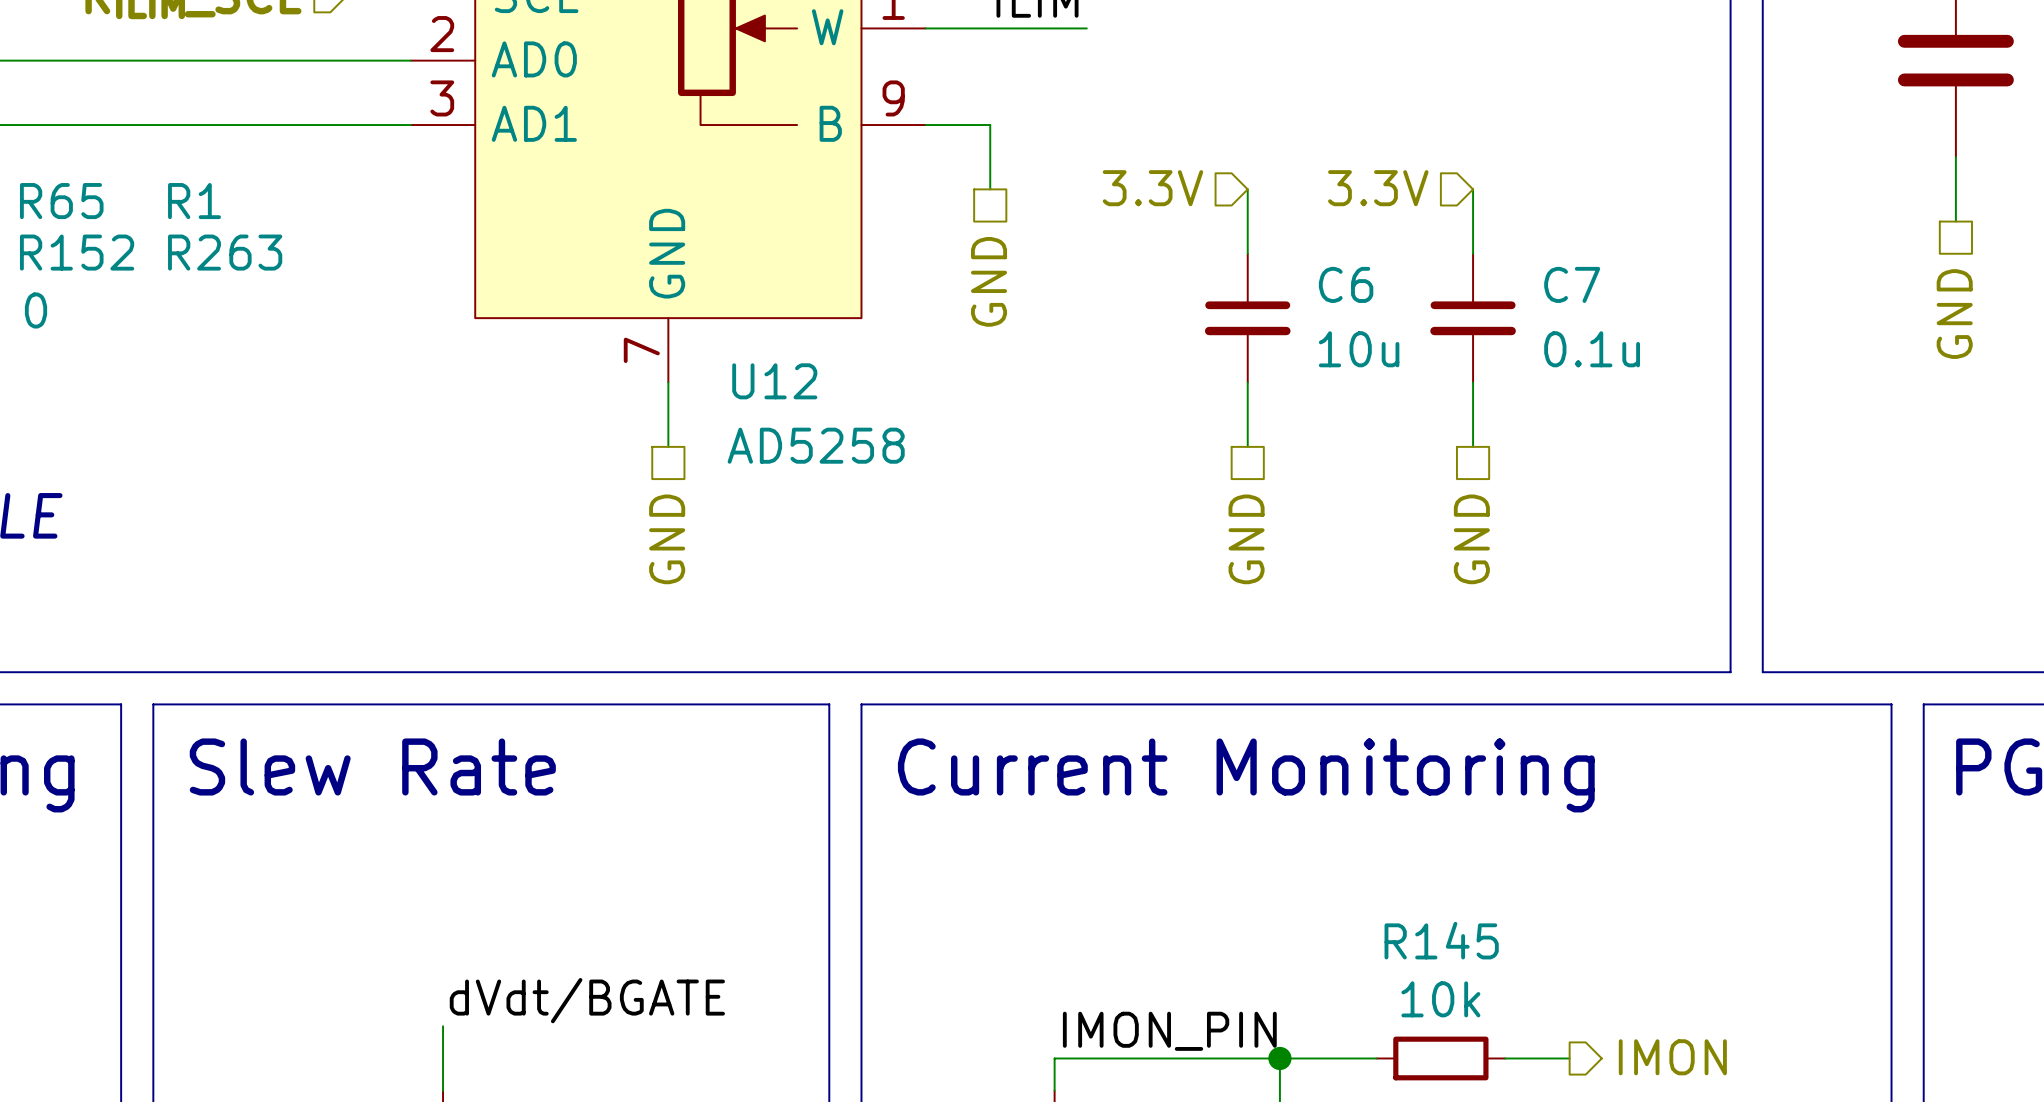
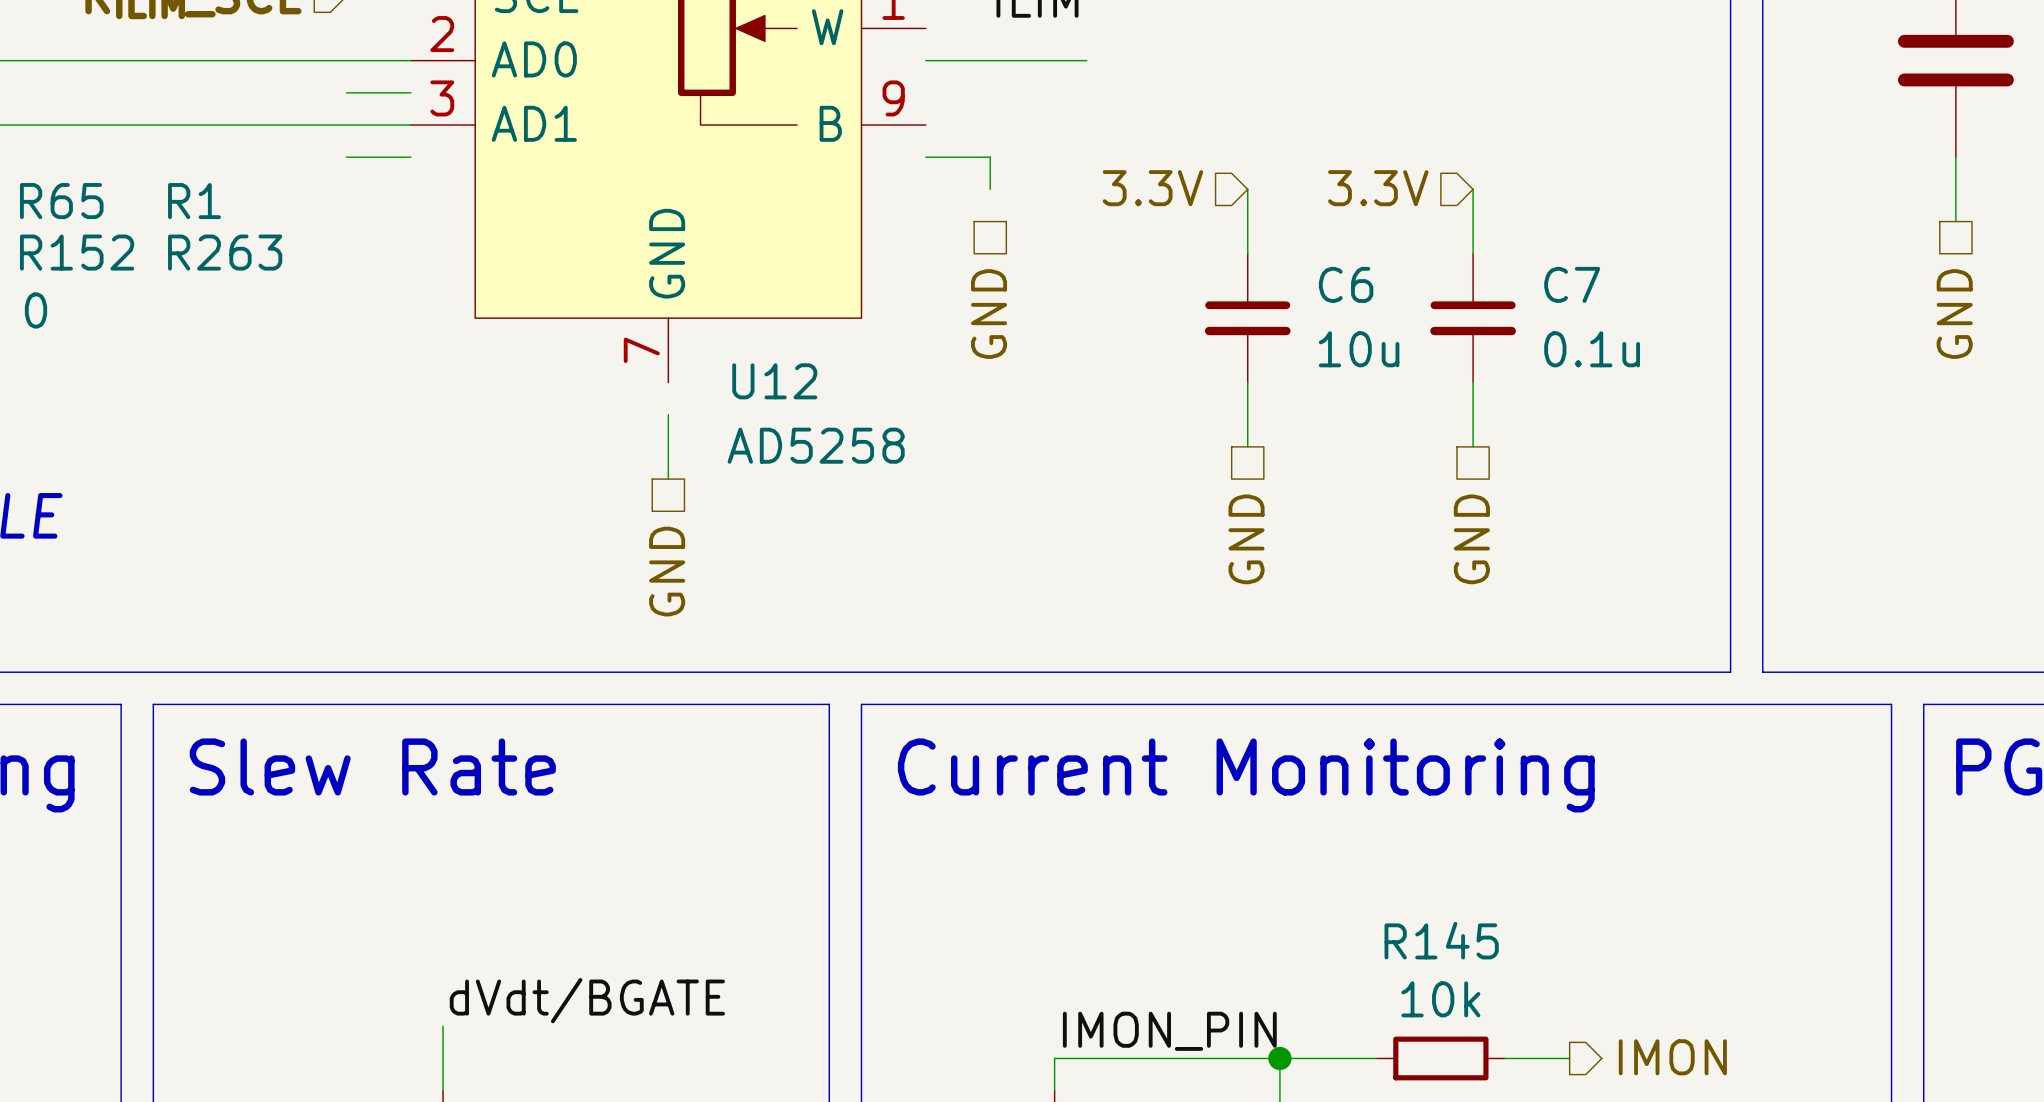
wire: (925, 28) (1086, 28) -> (925, 60) (1086, 60)
wire: none -> (346, 92) (410, 92)
wire: (925, 125) (990, 125) (990, 157) -> (925, 157) (990, 157)
wire: none -> (346, 157) (410, 157)
hierarchical label position: GND (989, 281) -> GND (989, 314)
wire: (668, 382) (668, 414) -> (668, 446) (668, 479)
hierarchical label position: GND (667, 539) -> GND (667, 571)

